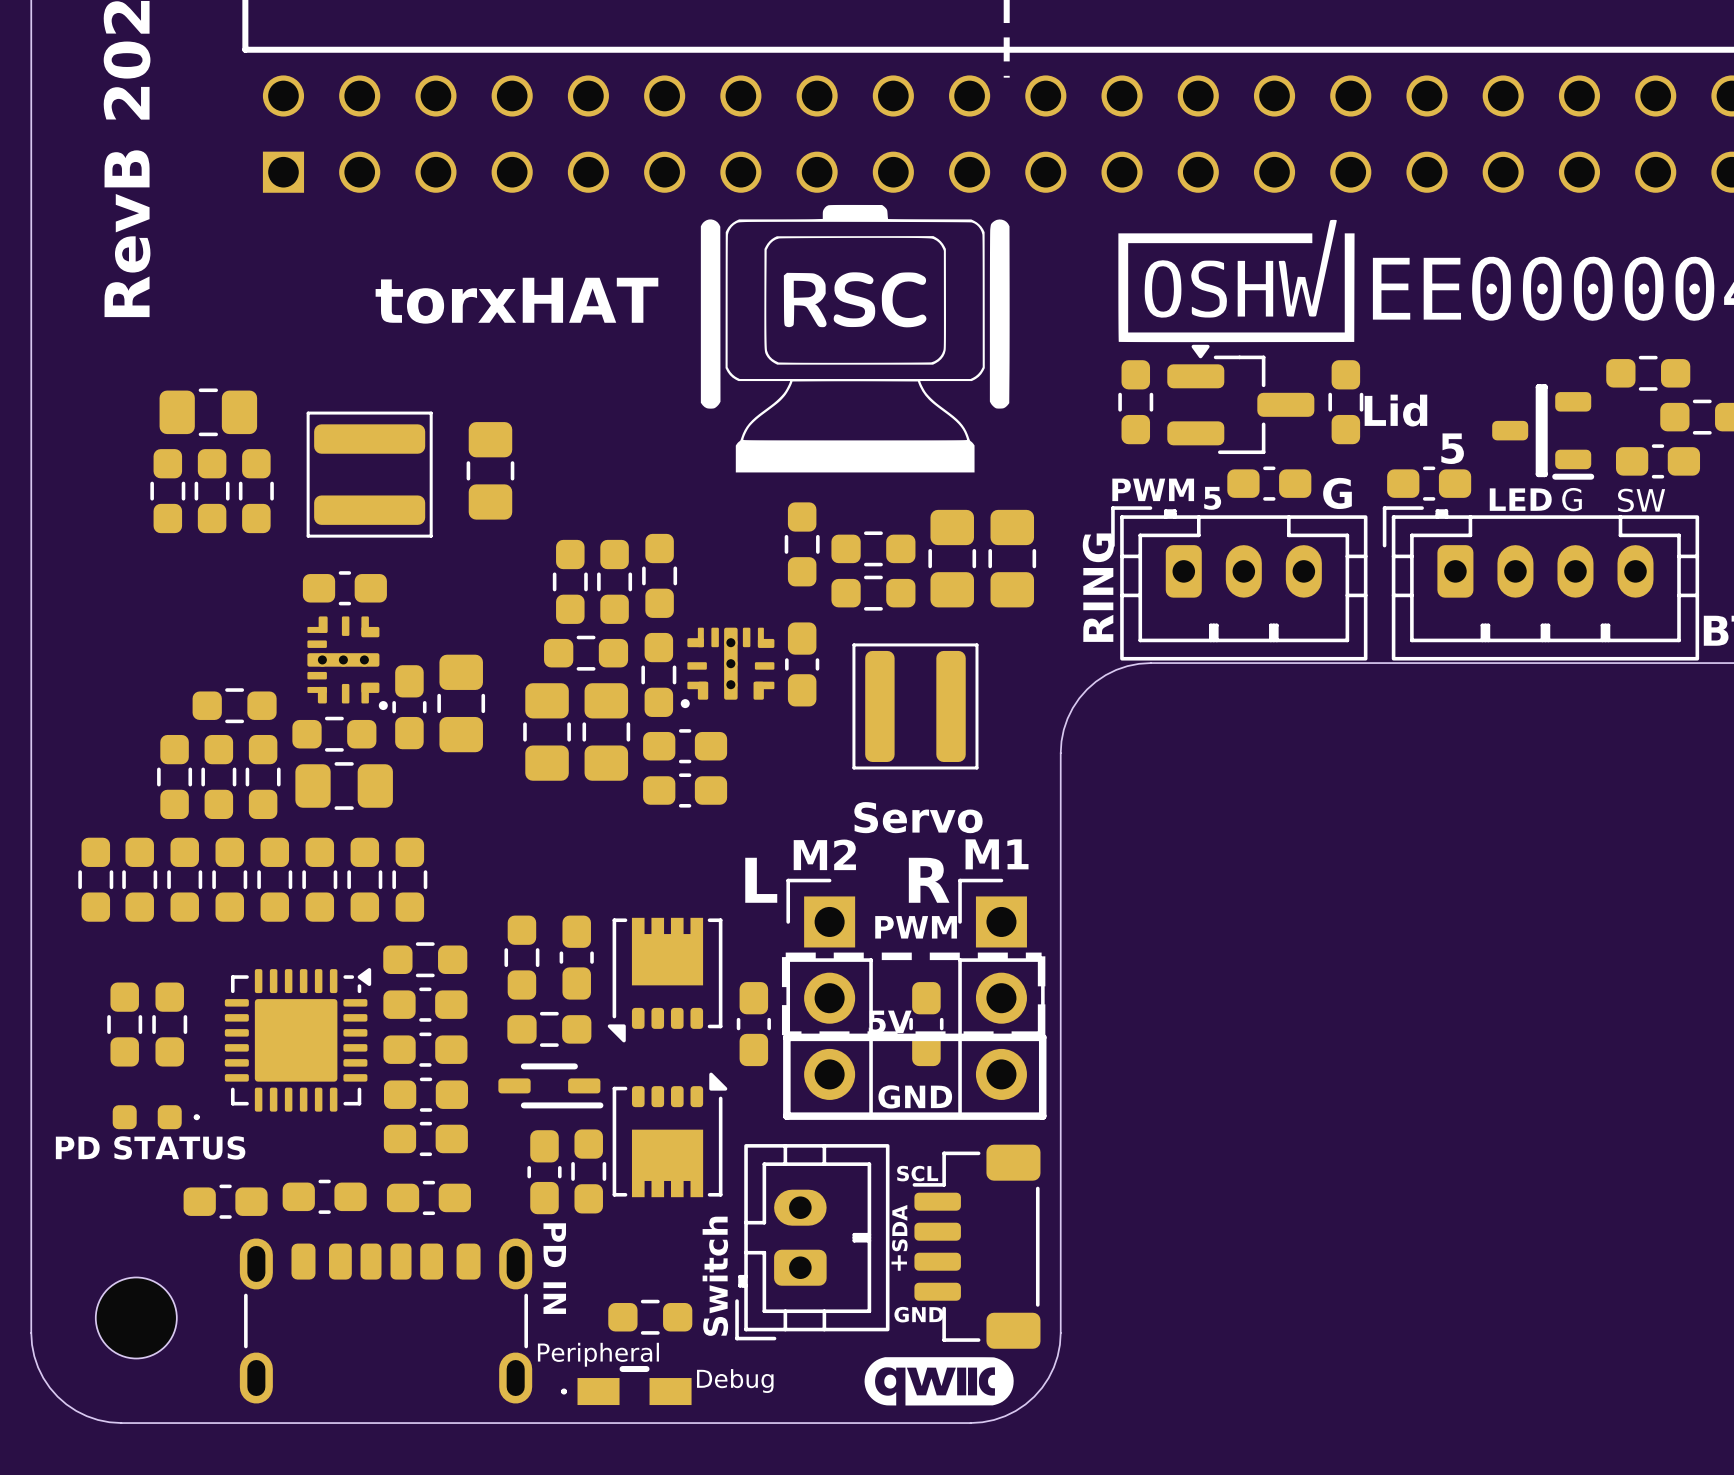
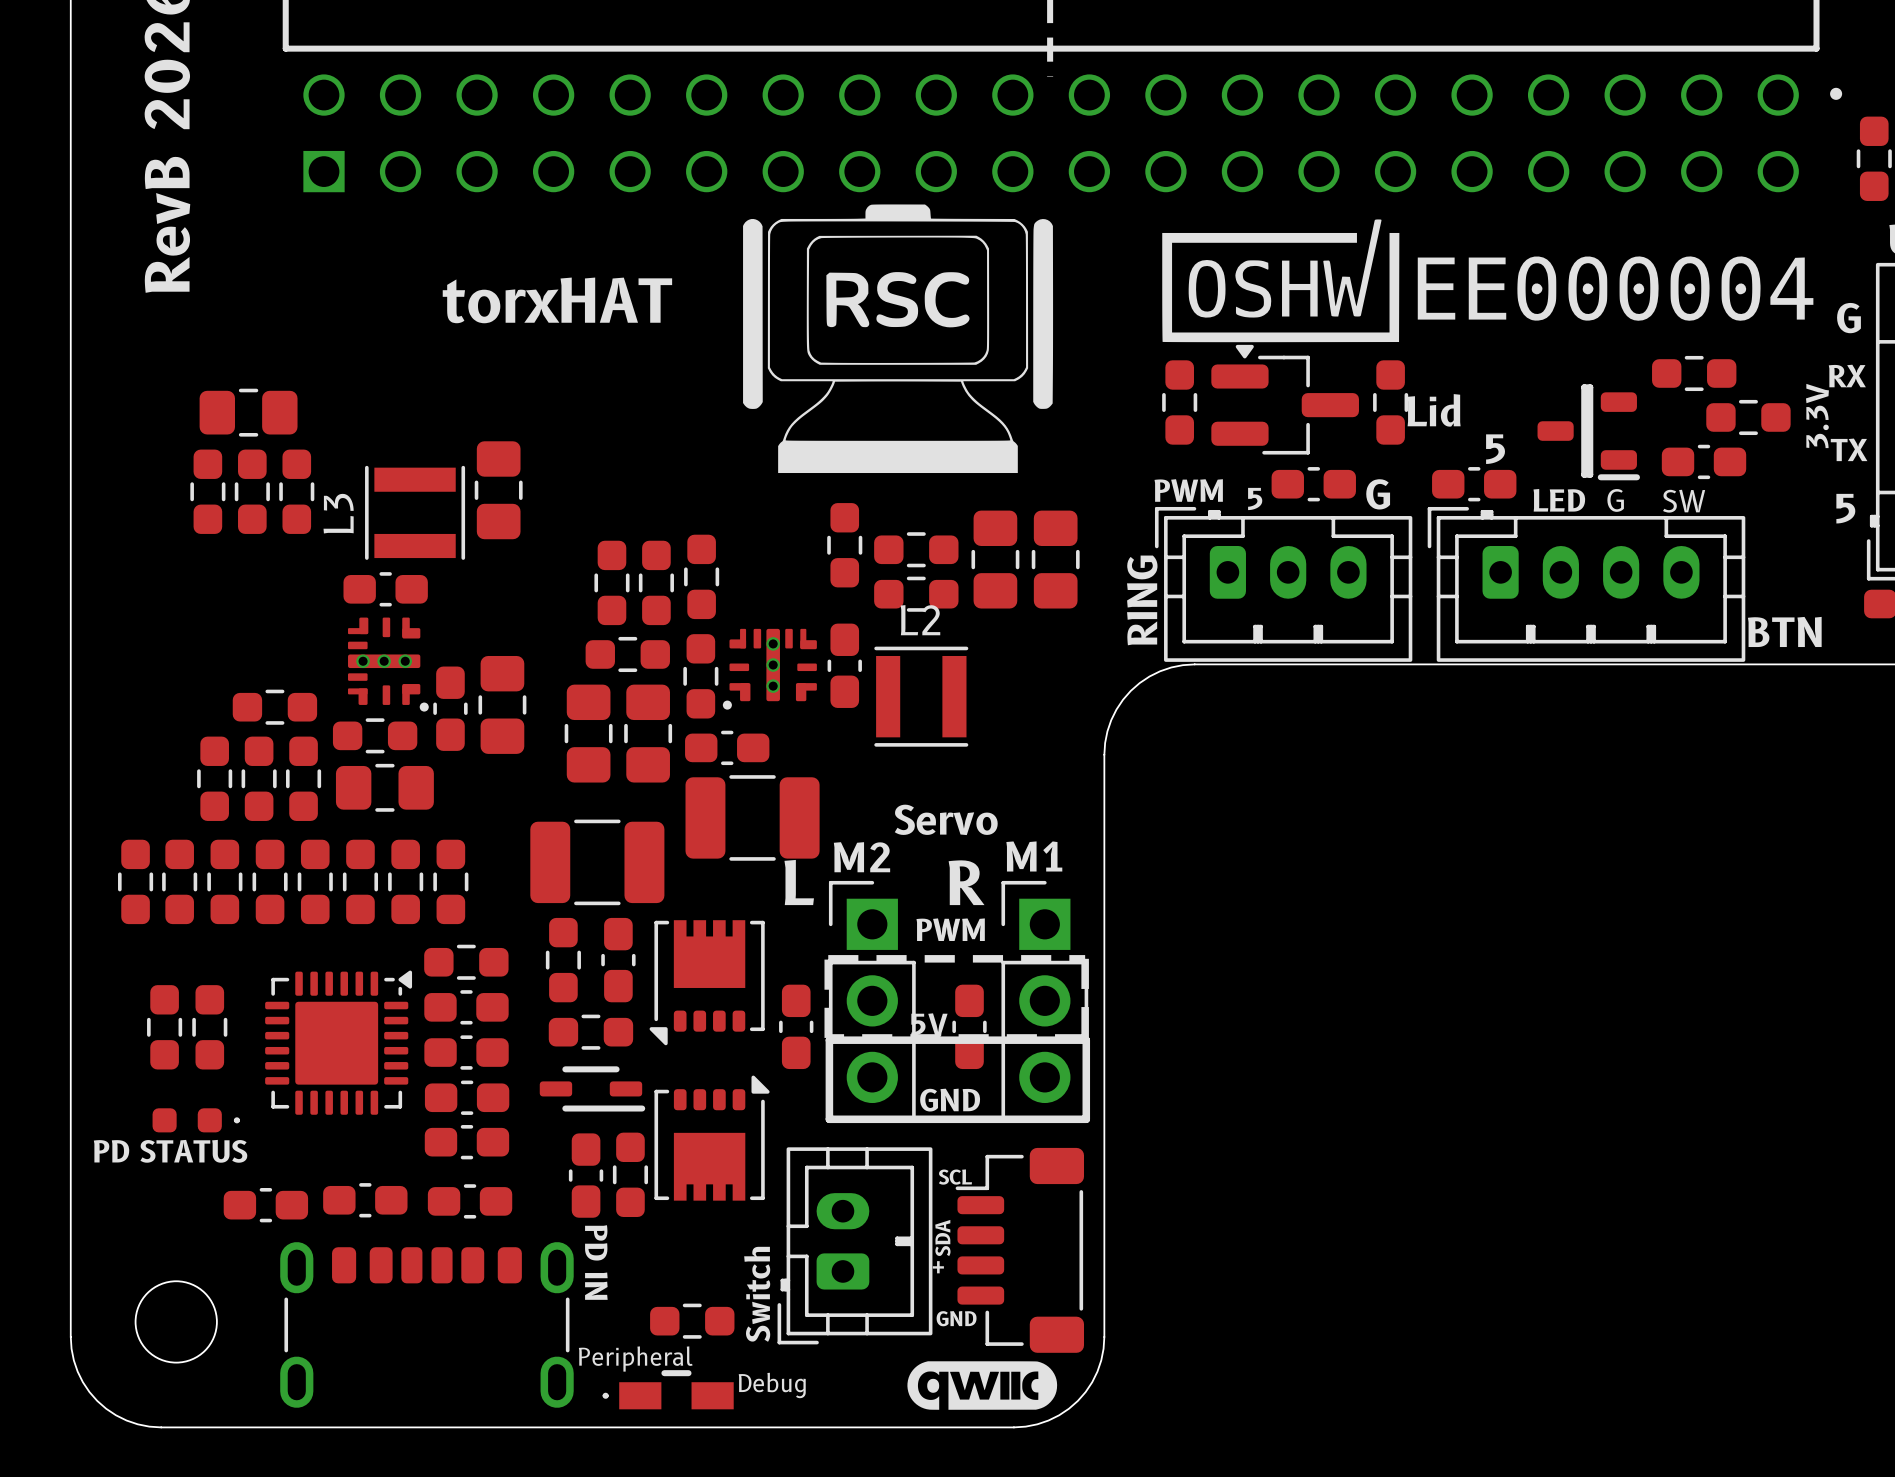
part position: (490, 470) -> (498, 490)
part: (369, 474) -> none
L3: none -> (415, 512)
L2: none -> (921, 696)
part: (915, 706) -> none
part: (685, 790) -> none
part: none -> (752, 817)
part: none -> (597, 862)

